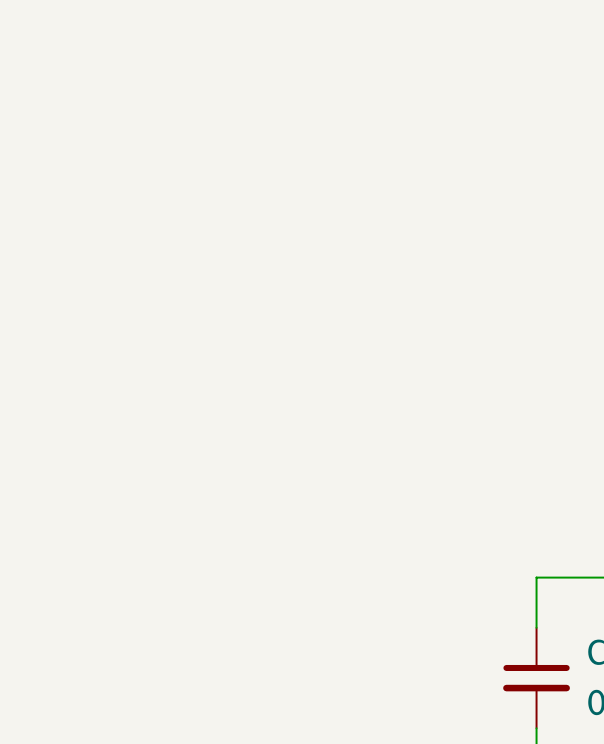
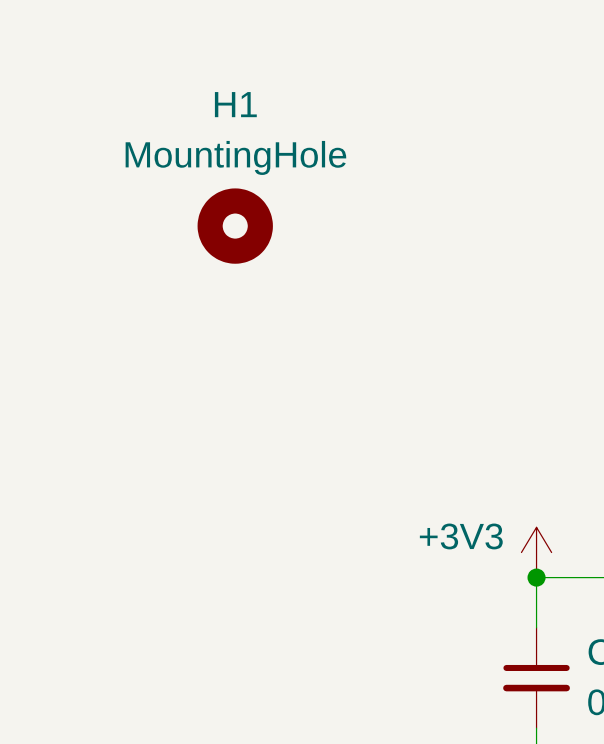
H1: none -> MountingHole (235, 226)
power symbol: none -> +3V3 (536, 552)
junction: none -> (536, 577)

